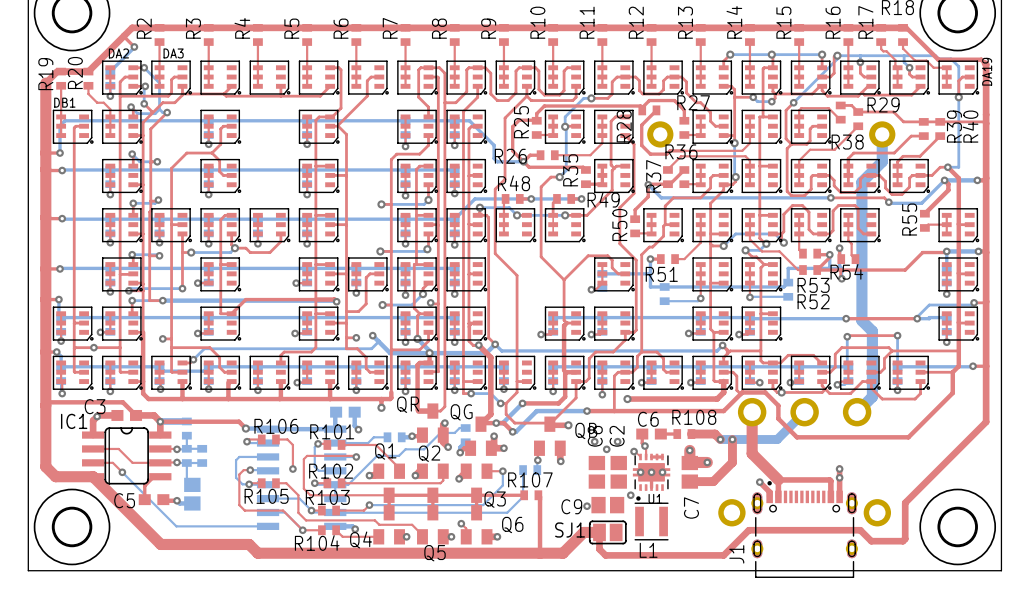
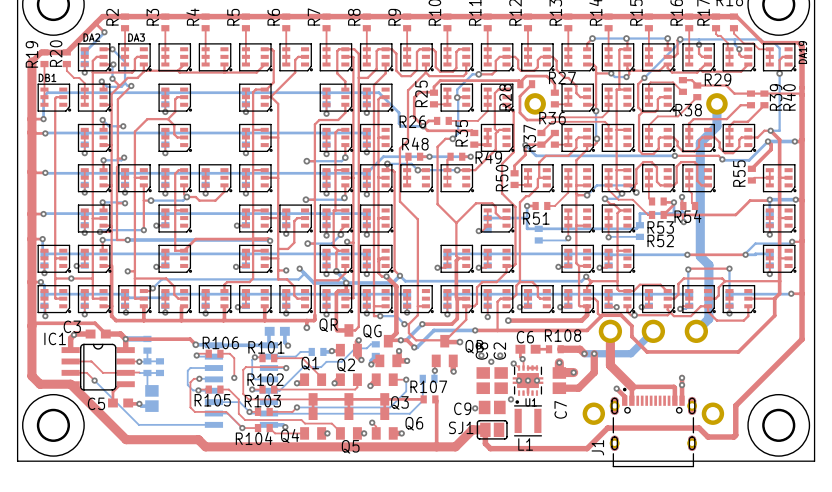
via: (177, 462) -> none

